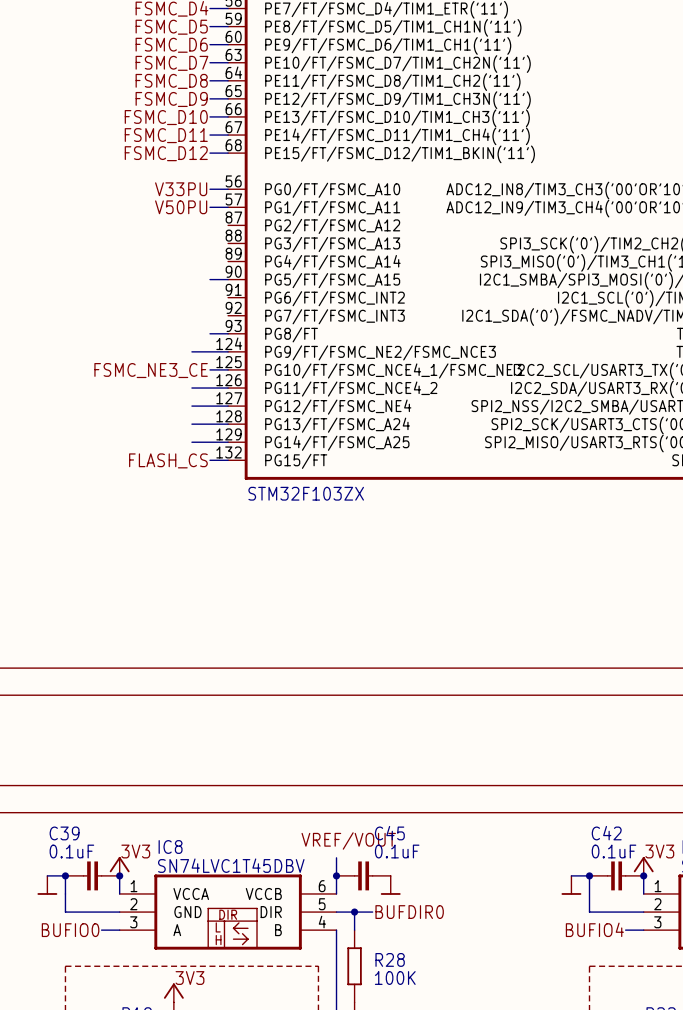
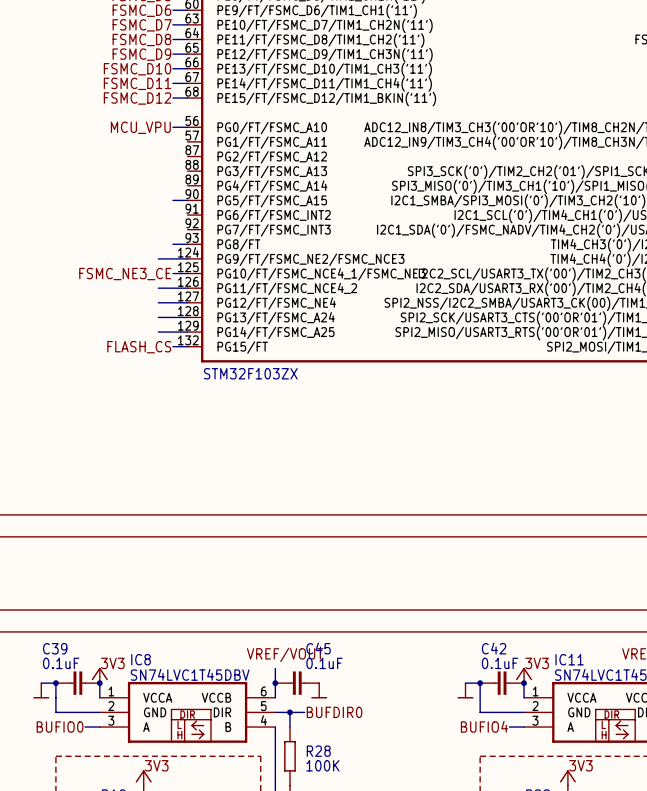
label: V33PU (181, 189) -> MCU_VPU (140, 127)
label: V50PU (181, 207) -> none
wire: (210, 207) (228, 207) -> none

